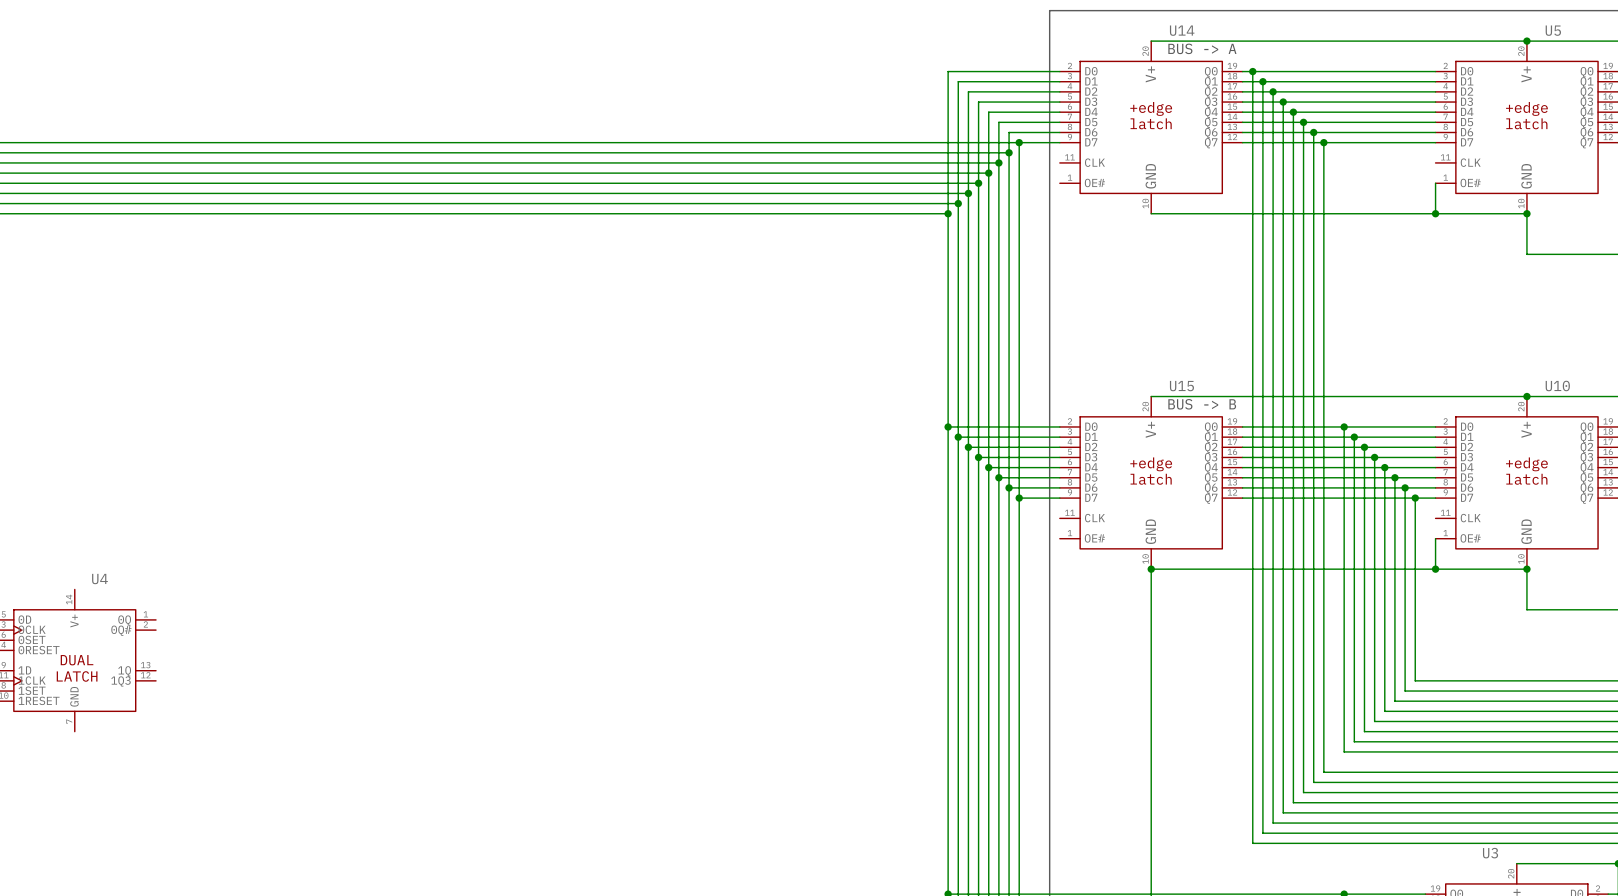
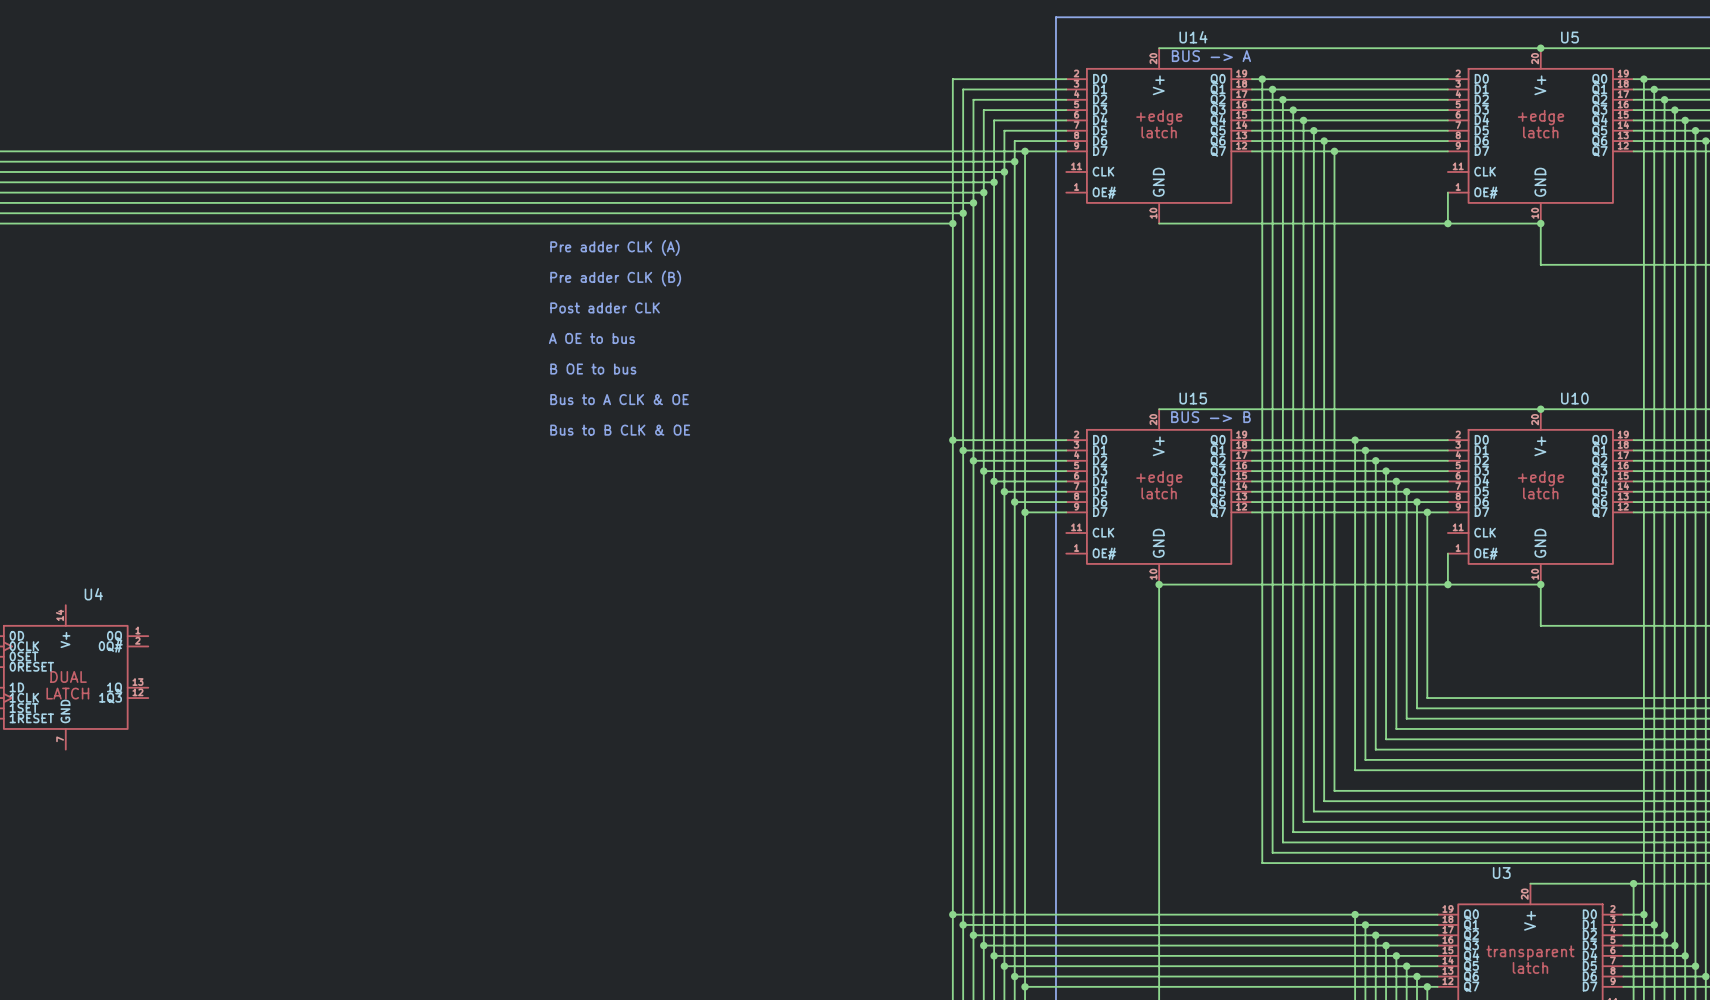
text: none -> Pre adder CLK (A) (615, 247)
text: none -> Pre adder CLK (B) (615, 278)
text: none -> Post adder CLK (605, 307)
text: none -> A OE to bus (591, 338)
text: none -> B OE to bus (593, 369)
text: none -> Bus to A CLK & OE (619, 399)
text: none -> Bus to B CLK & OE (620, 430)

